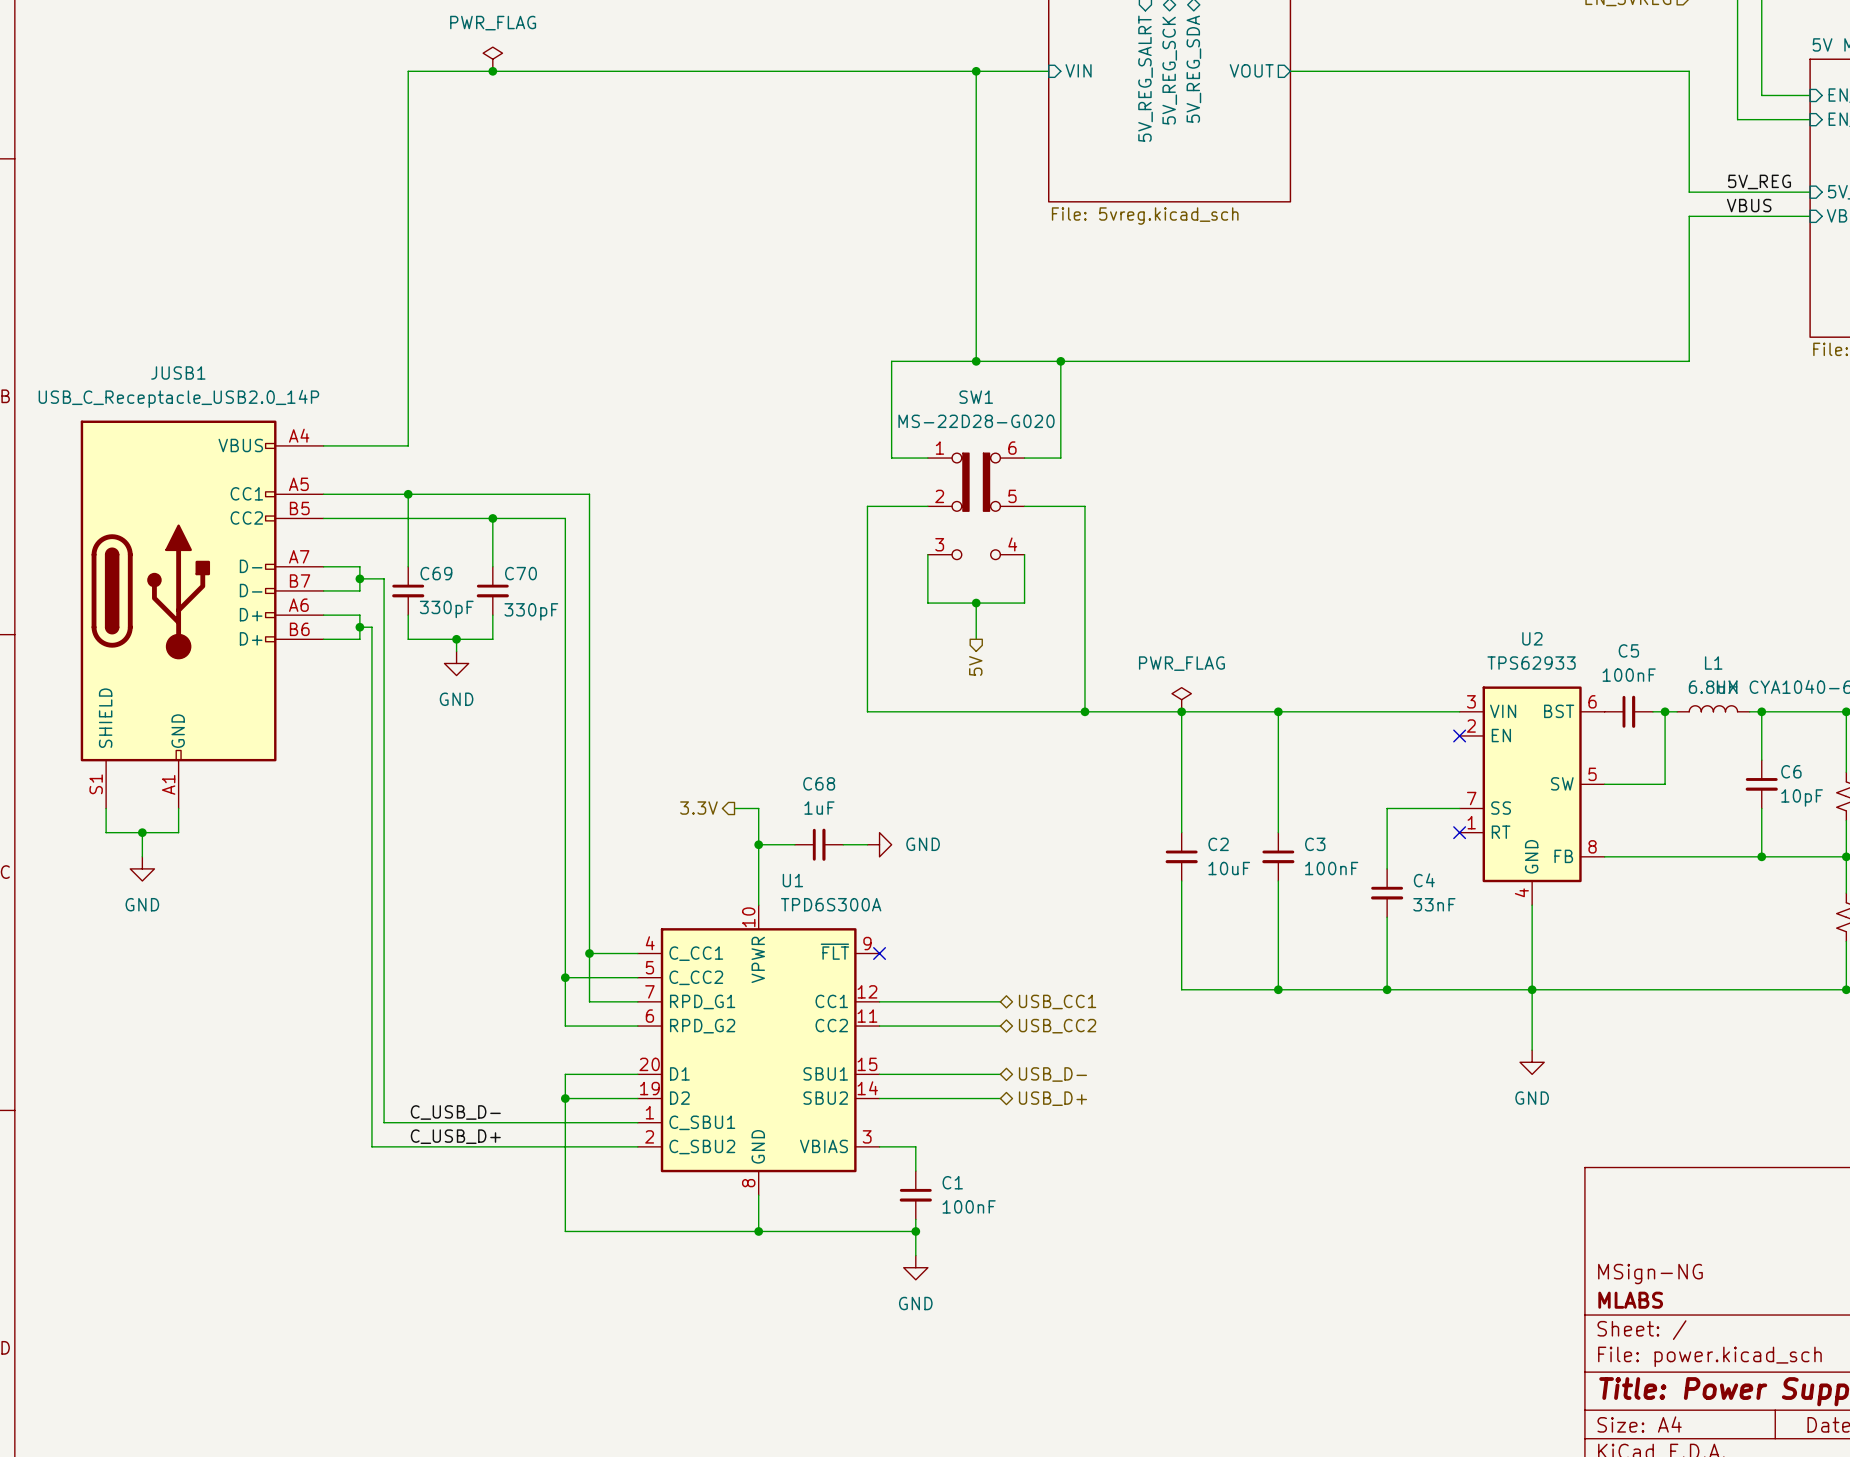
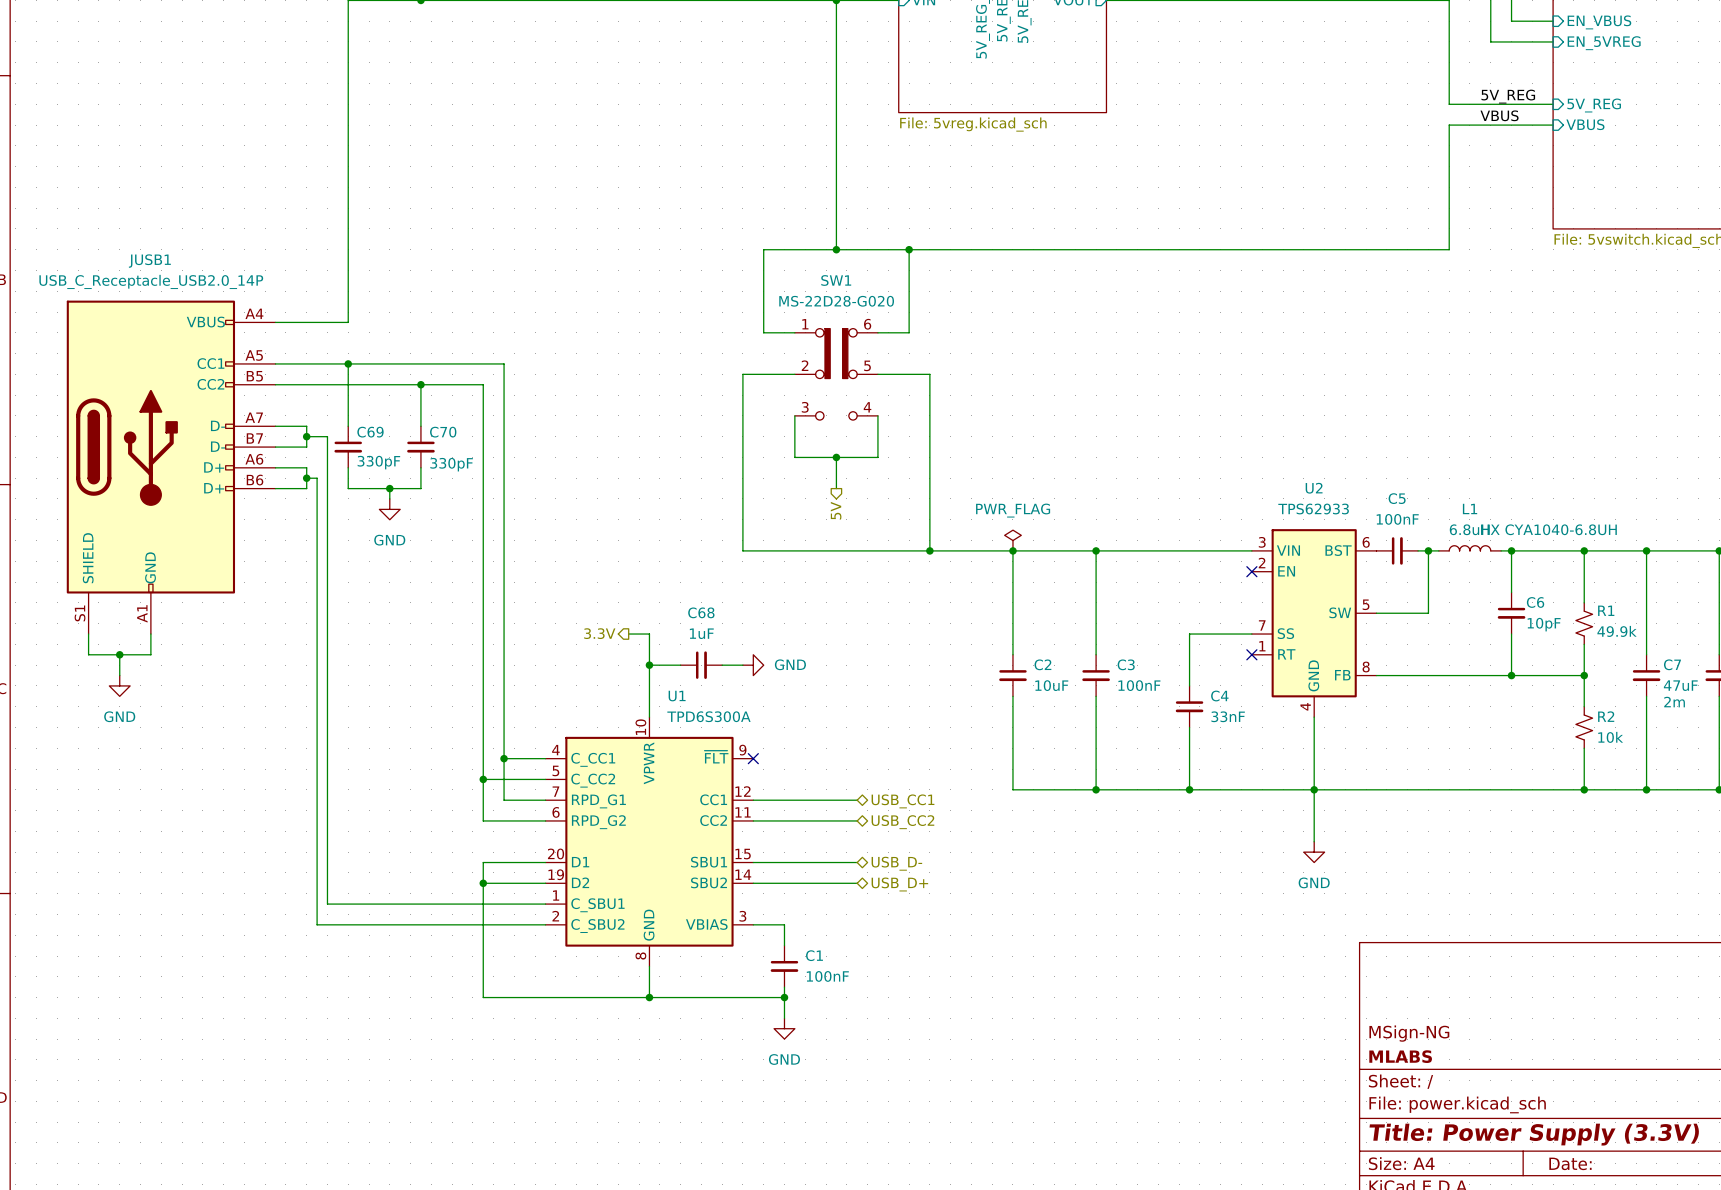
label: C_USB_D- (455, 1112) -> none
label: C_USB_D+ (455, 1136) -> none

